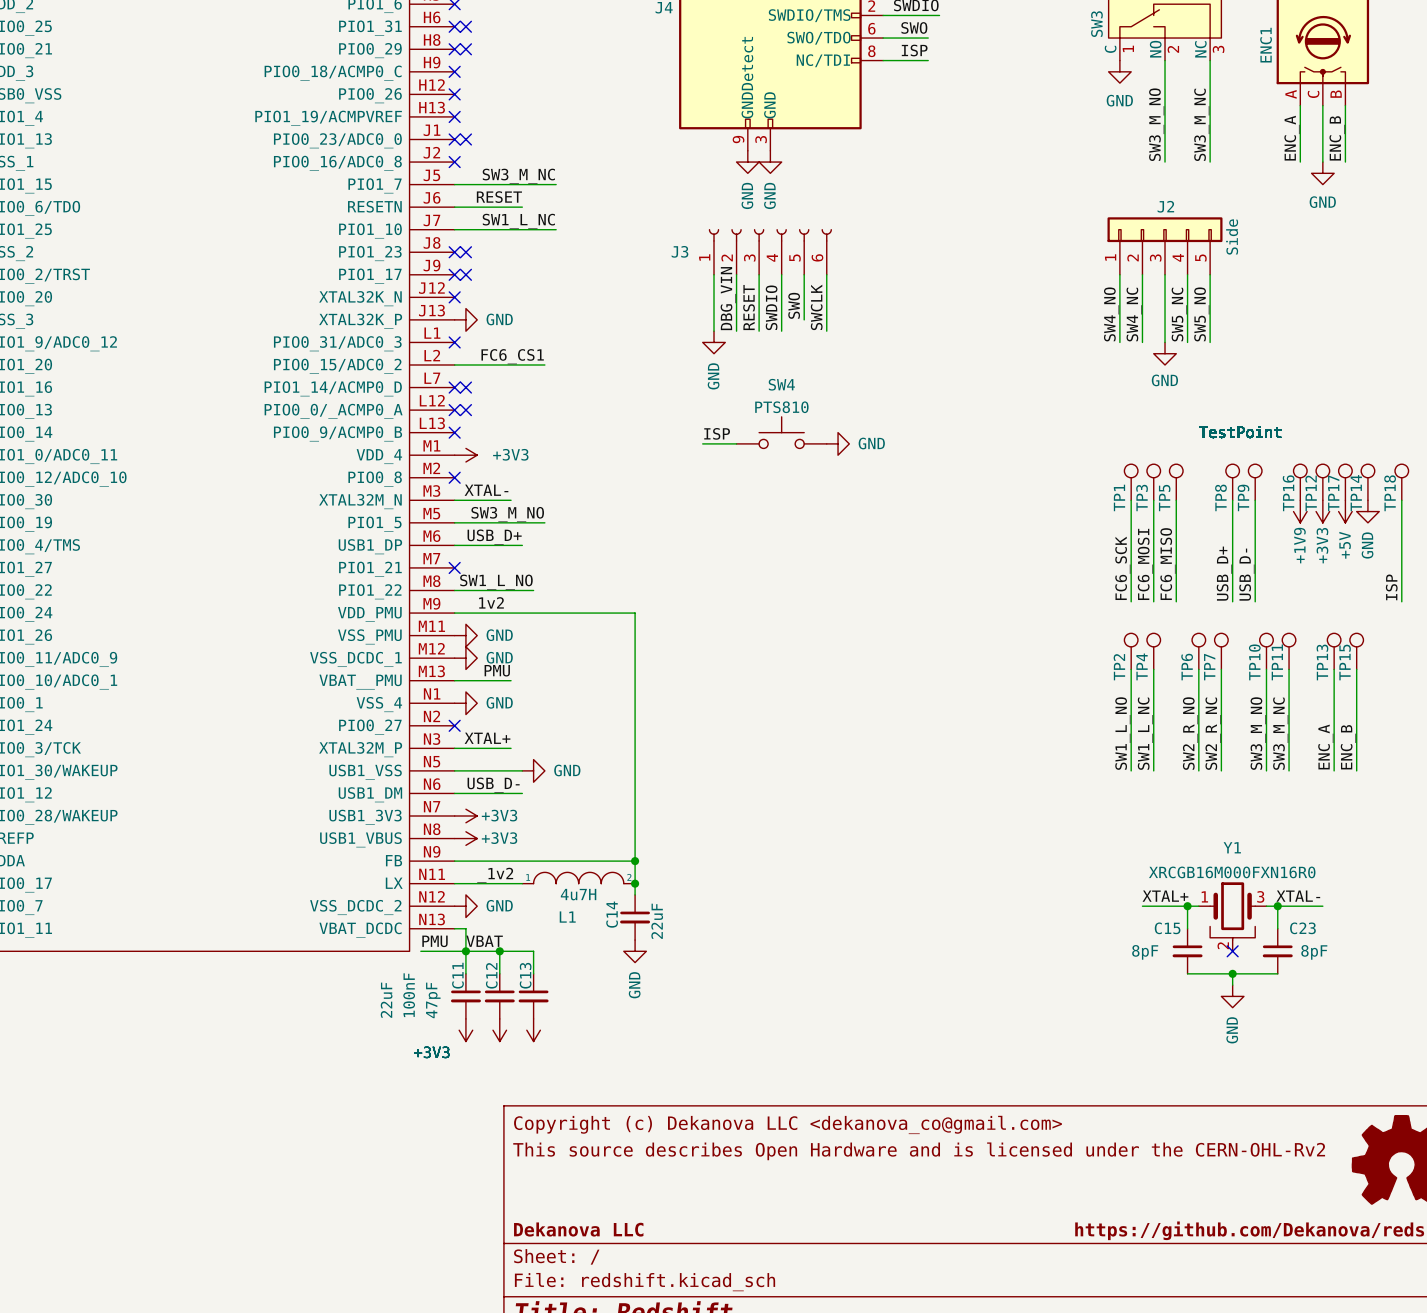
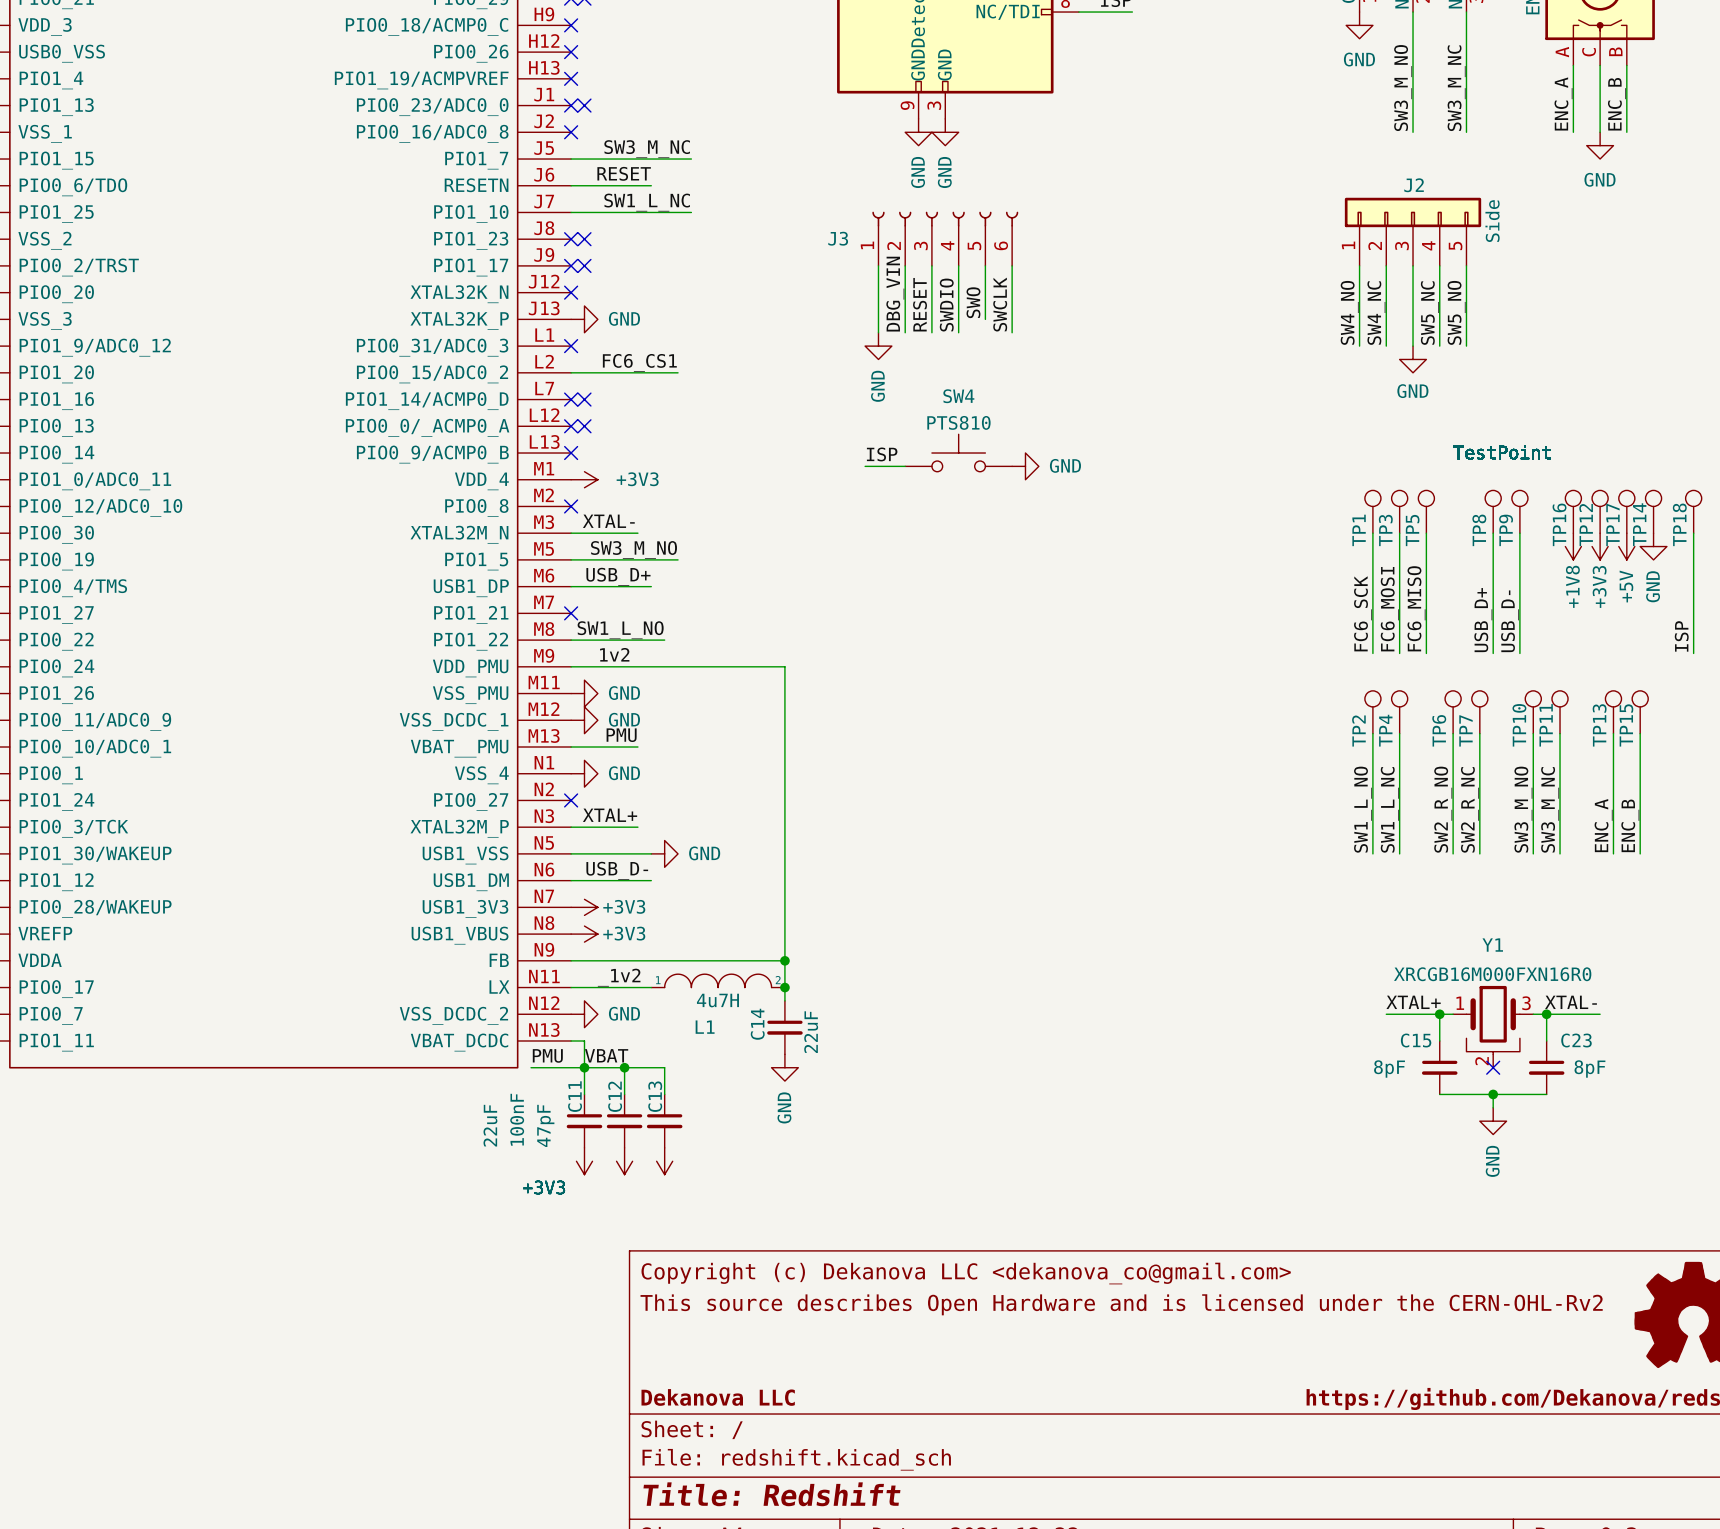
power symbol: +1V9 (1300, 511) -> +1V8 (1573, 546)

